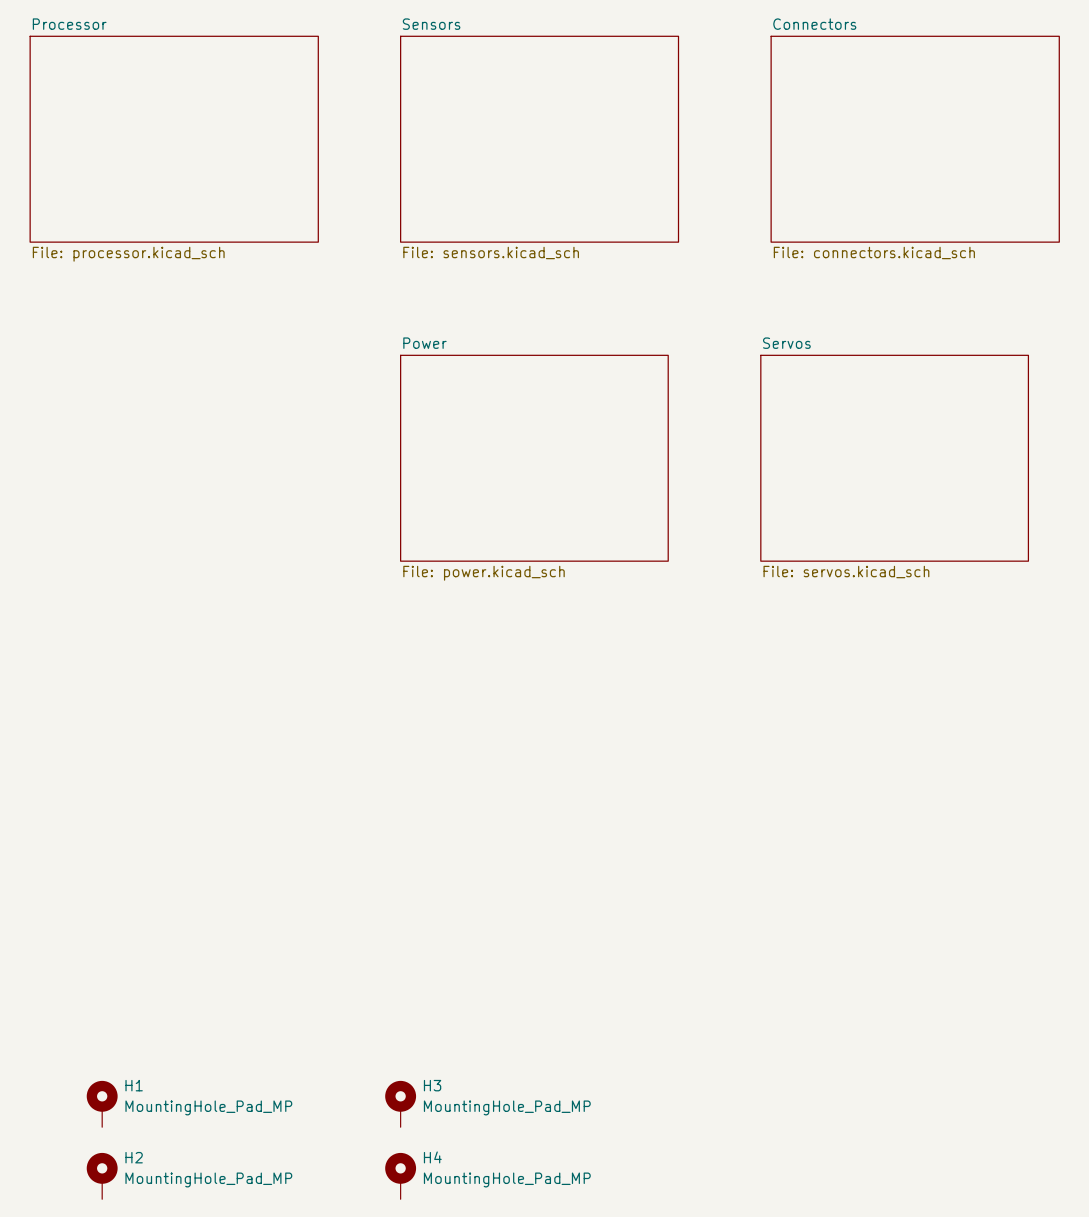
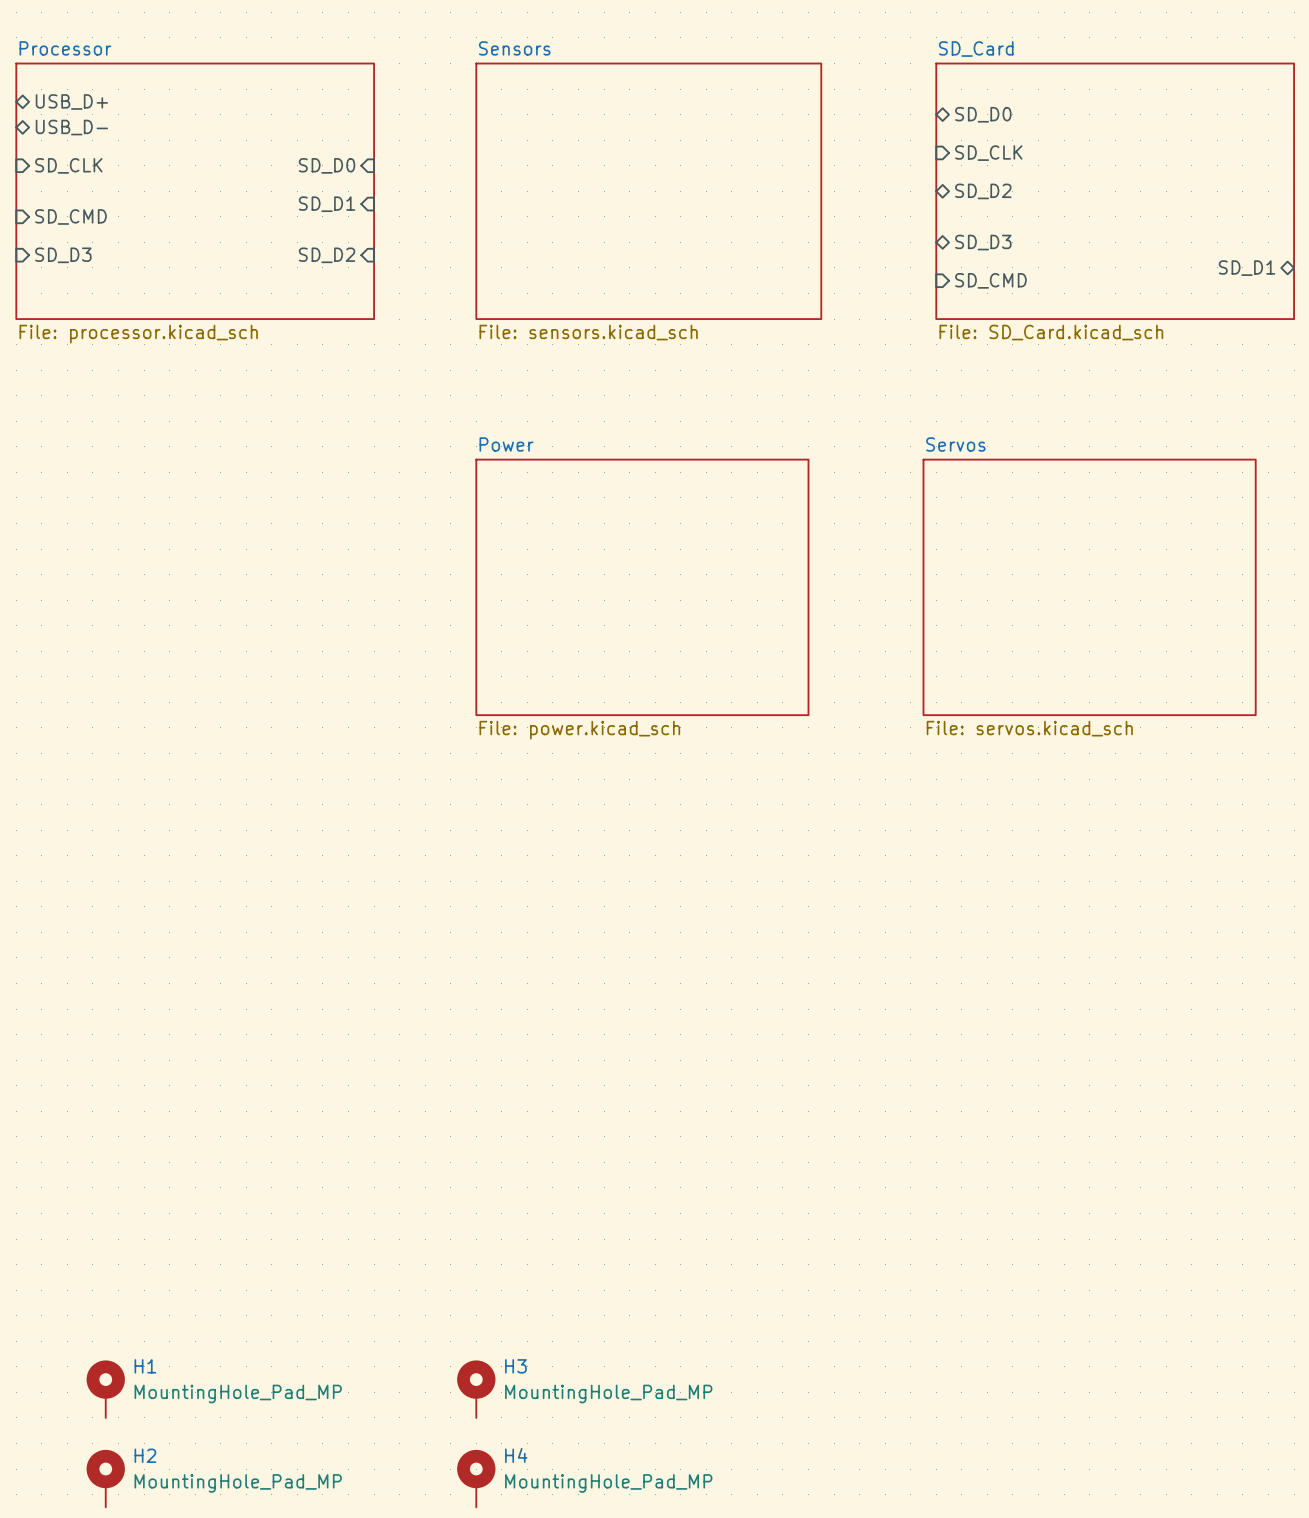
sheet Connectors name: Connectors (814, 24) -> SD_Card (976, 49)
sheet pin: none -> USB_D+ (71, 101)
sheet pin: none -> SD_D0 (983, 114)
sheet pin: none -> USB_D- (71, 127)
sheet pin: none -> SD_CLK (988, 153)
sheet pin: none -> SD_CLK (68, 165)
sheet pin: none -> SD_D0 (327, 165)
sheet pin: none -> SD_D2 (983, 191)
sheet pin: none -> SD_D1 (327, 204)
sheet pin: none -> SD_CMD (70, 216)
sheet pin: none -> SD_D3 (983, 242)
sheet pin: none -> SD_D3 (63, 255)
sheet pin: none -> SD_D2 (327, 255)
sheet pin: none -> SD_D1 (1246, 268)
sheet pin: none -> SD_CMD (990, 280)
sheet Connectors value: File: connectors.kicad_sch (874, 252) -> File: SD_Card.kicad_sch (1051, 332)

